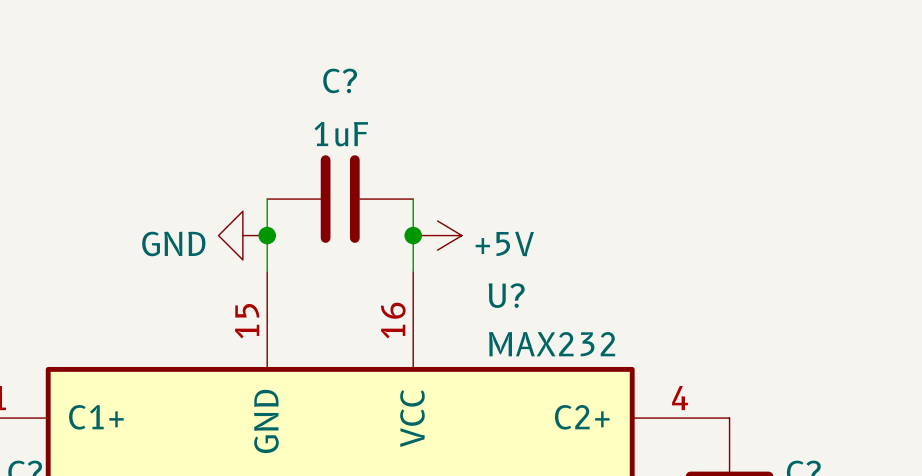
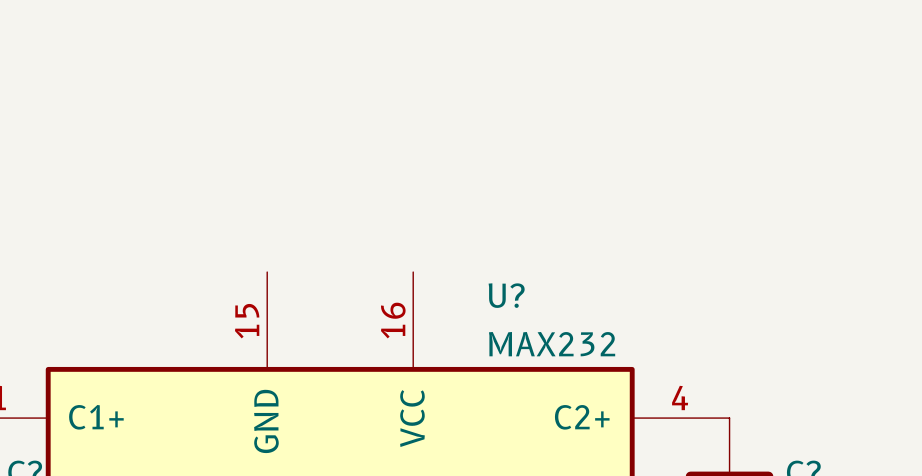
wire: (267, 199) (267, 272) -> none
C?: 1uF (340, 199) -> none
wire: (413, 199) (413, 272) -> none
power symbol: GND (242, 235) -> none
junction: (267, 235) -> none
junction: (413, 235) -> none
power symbol: +5V (437, 235) -> none

